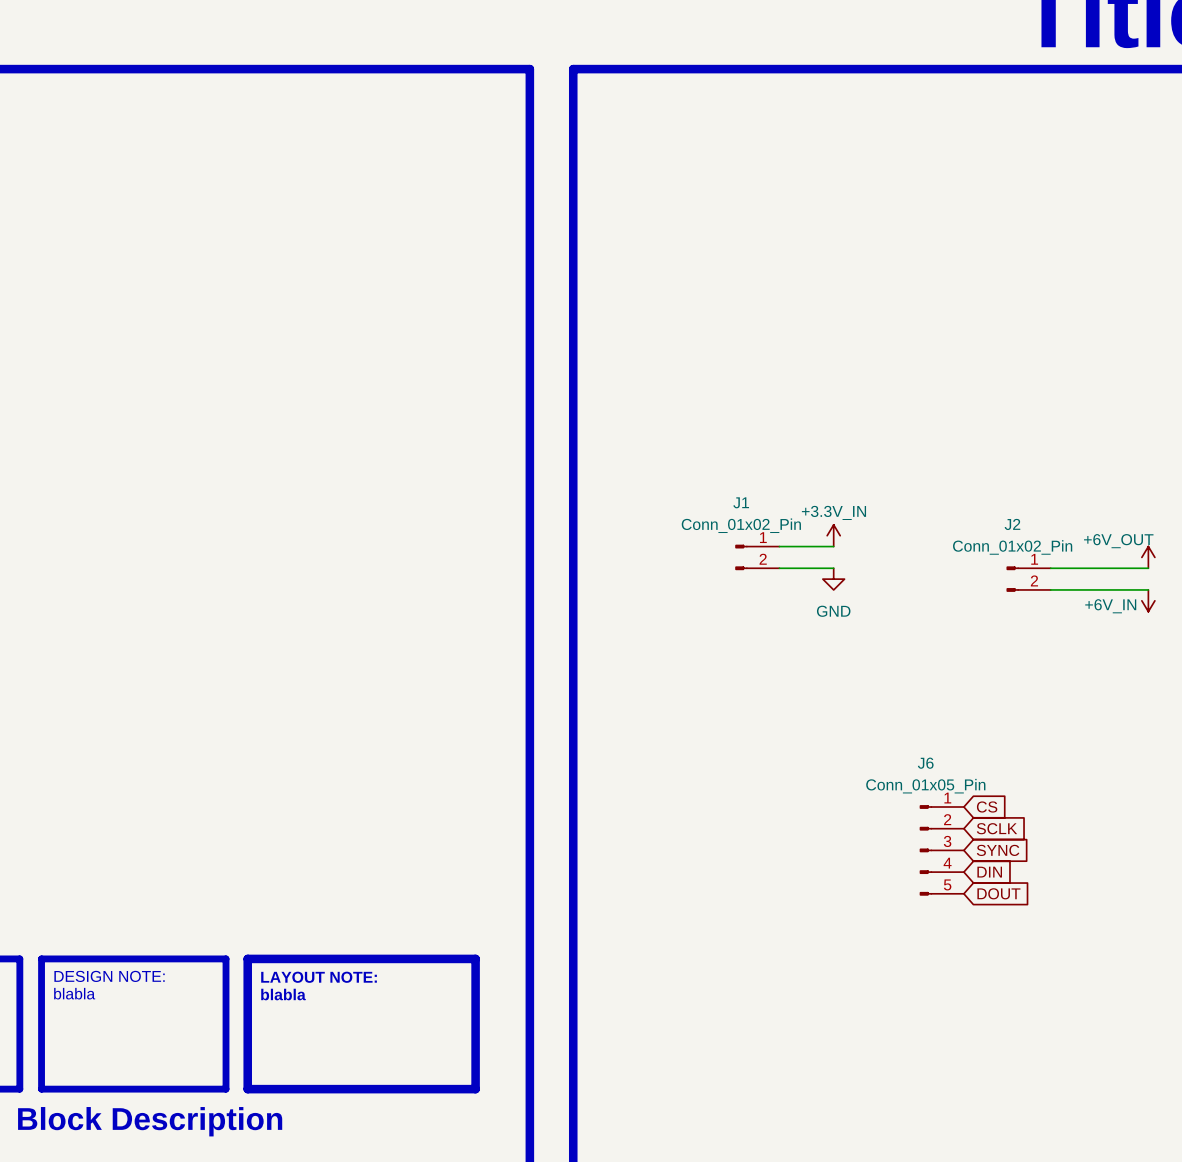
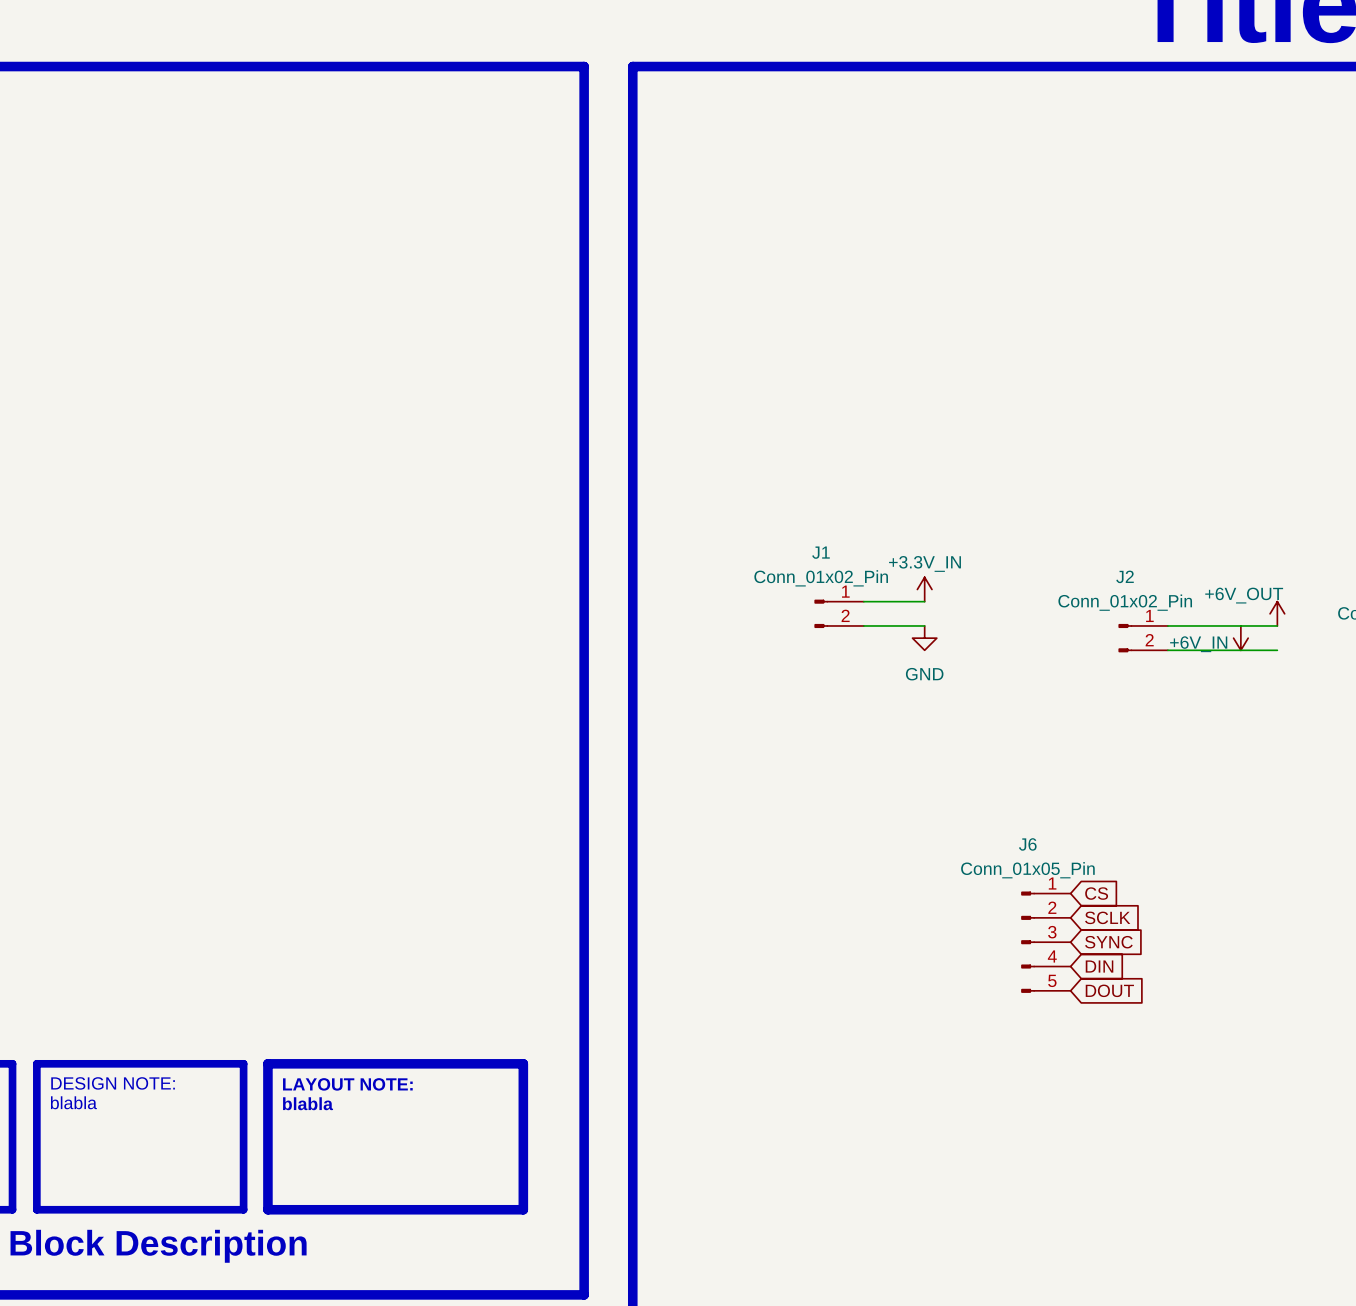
power symbol position: +6V_IN (1148, 600) -> +6V_IN (1240, 638)

